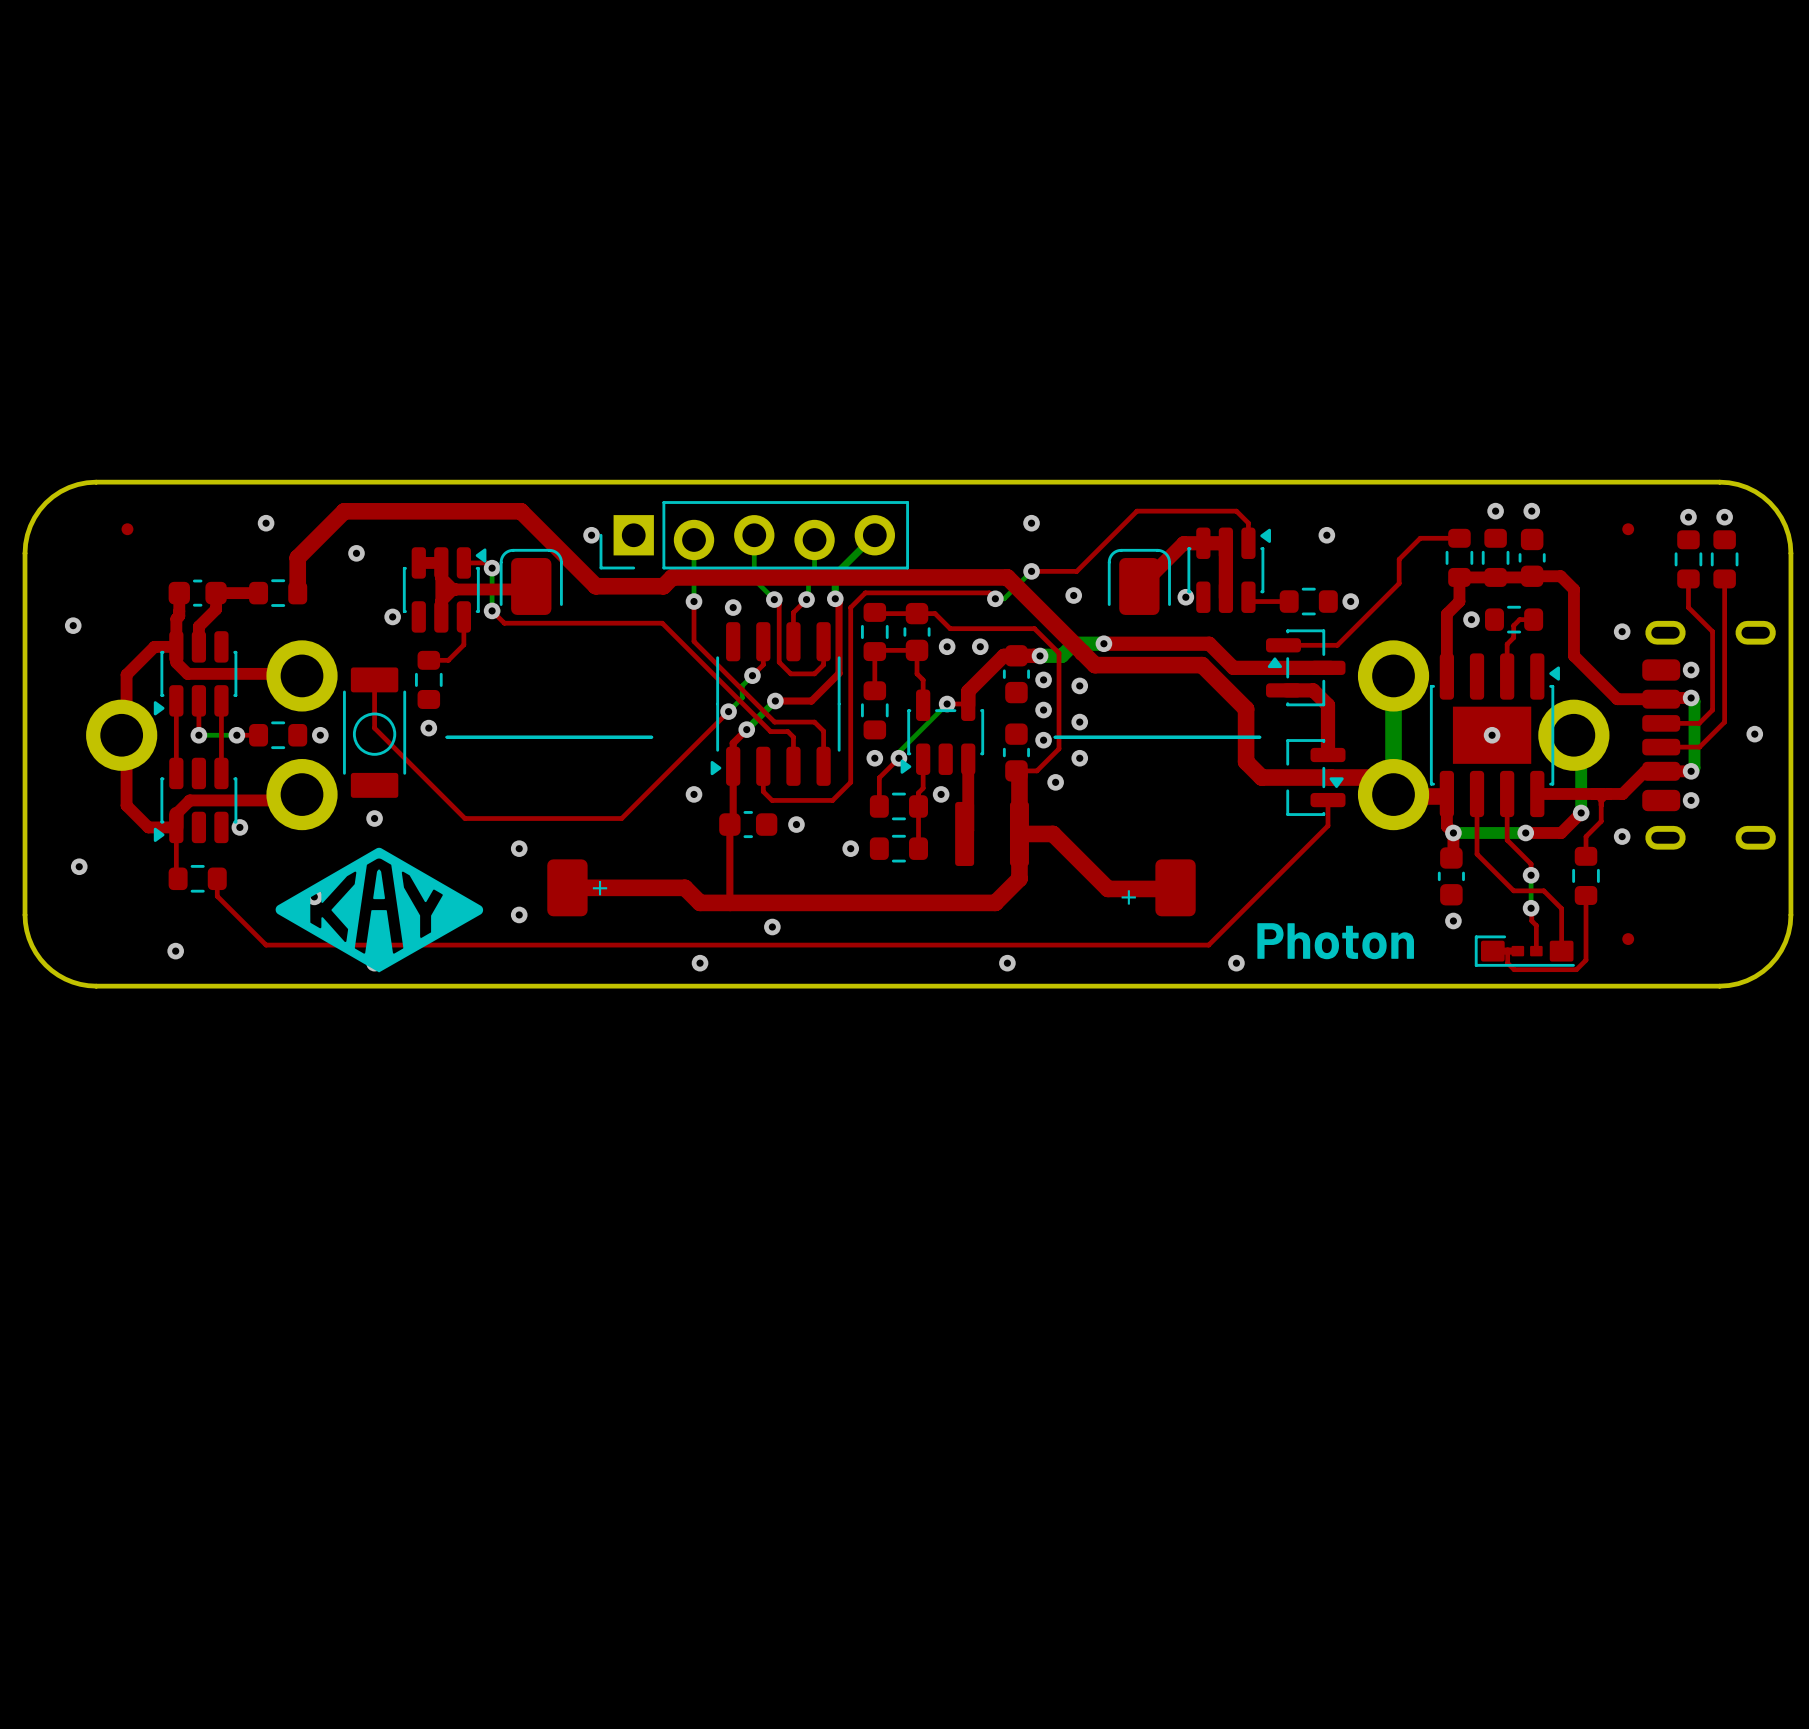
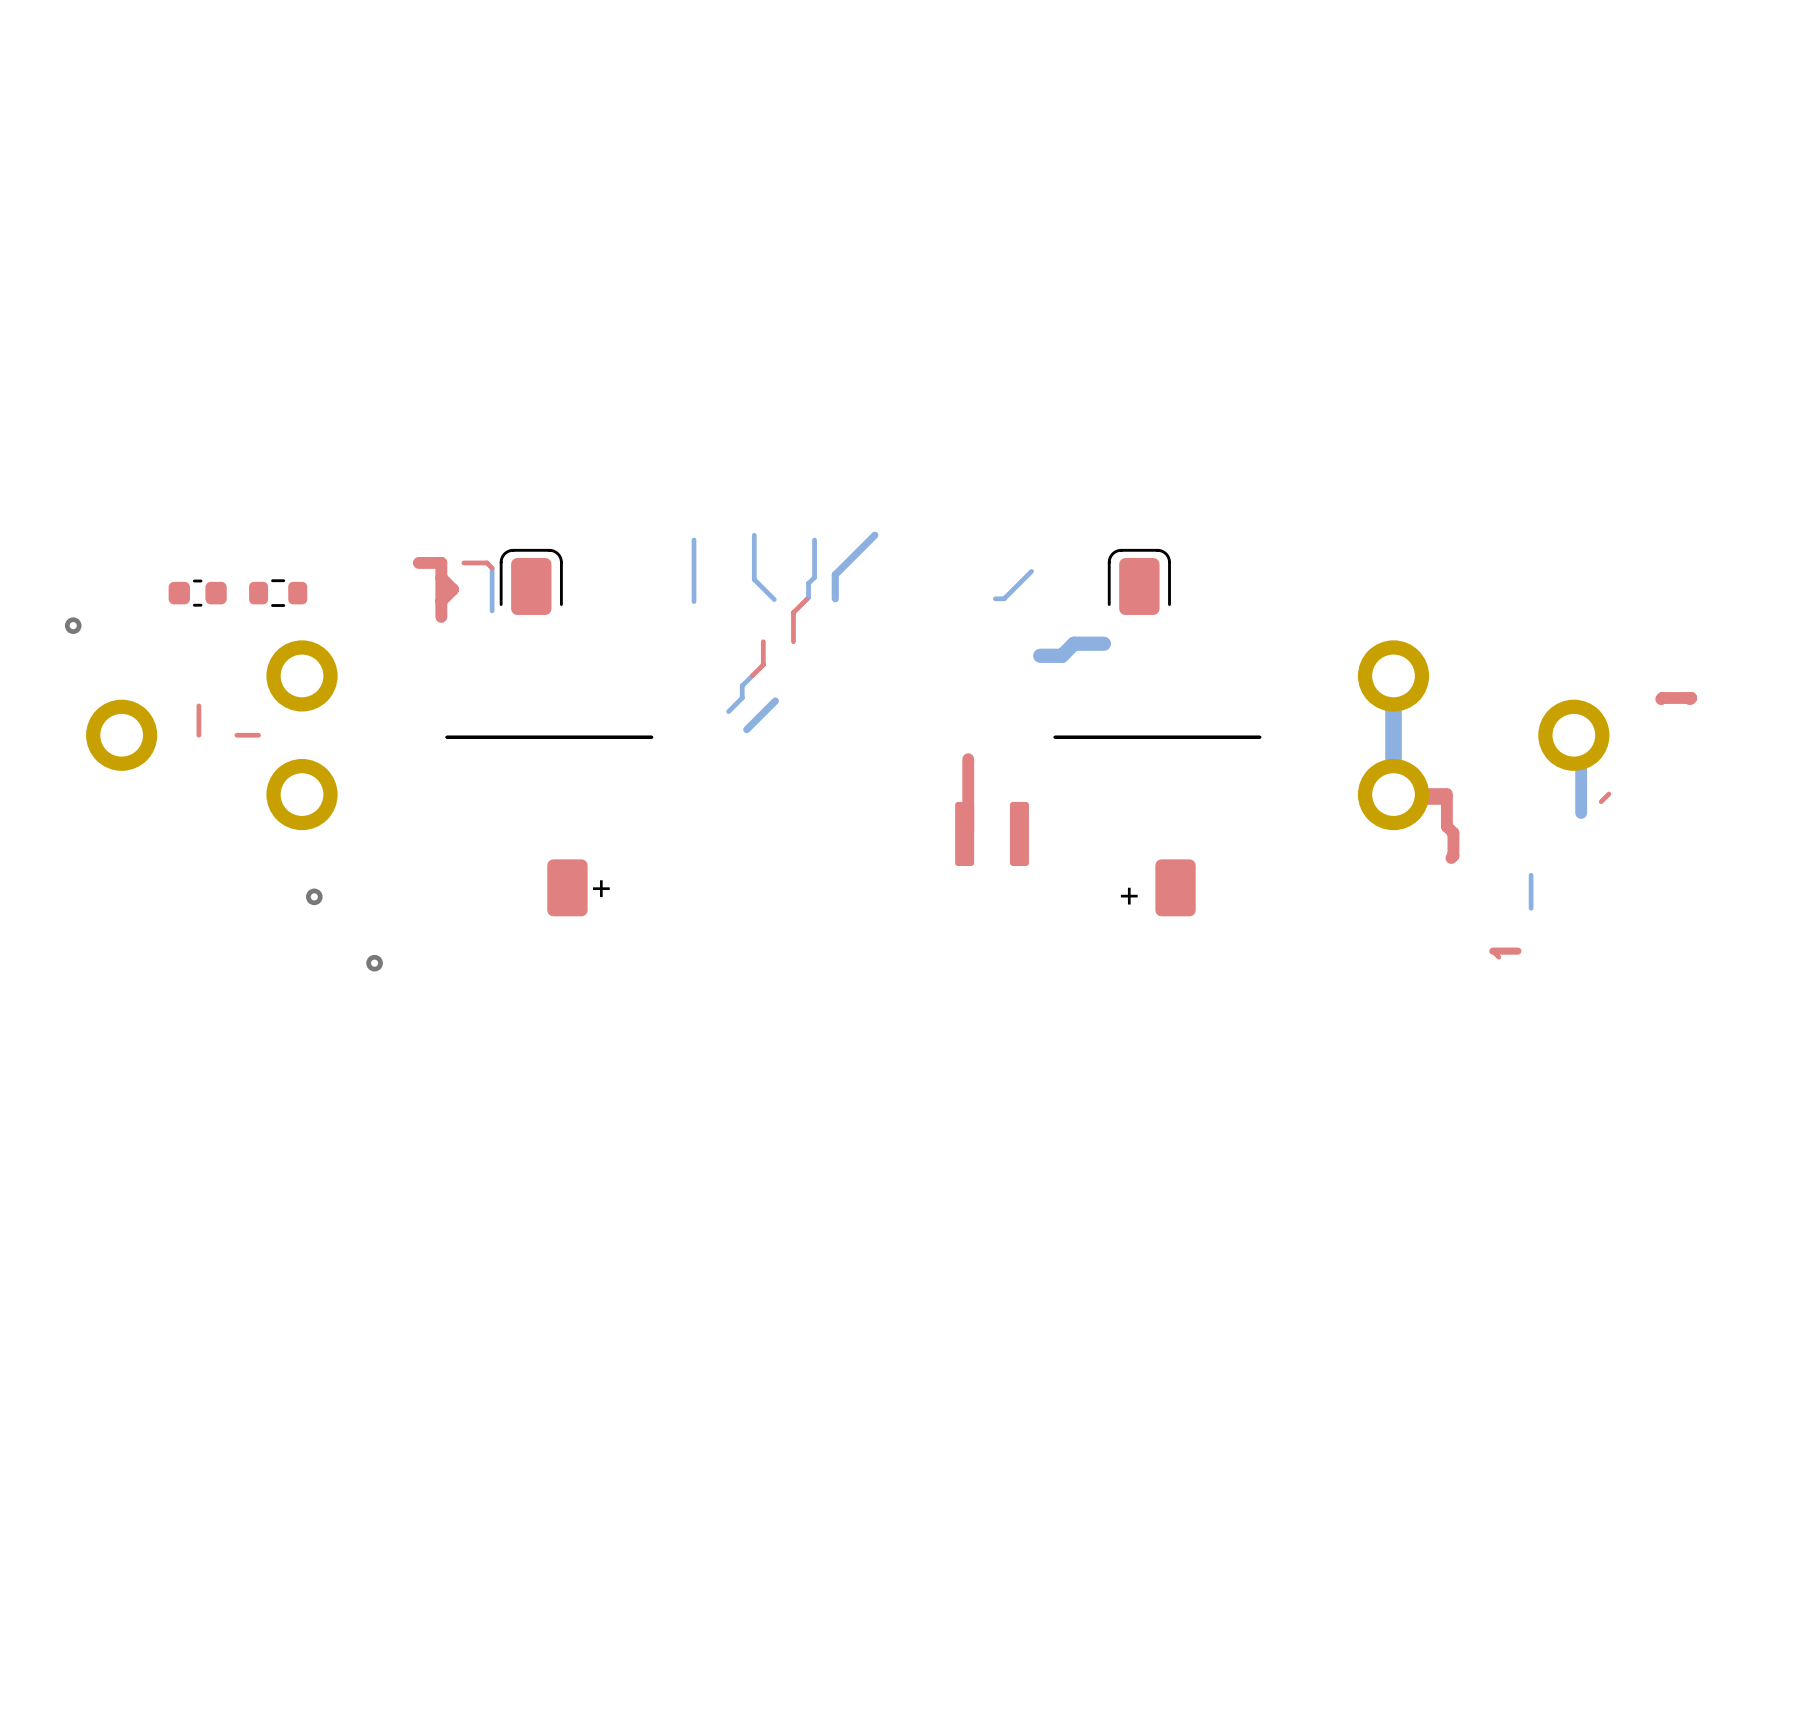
board edge: (96, 482) (1719, 482) (1738, 484) (1763, 496) (1776, 509) (1785, 526) (1790, 544) (1790, 914) (1788, 933) (1781, 950) (1763, 971) (1738, 983) (1719, 986) (96, 986) (80, 984) (65, 979) (45, 965) (32, 945) (25, 922) (25, 553) (30, 526) (45, 502) (68, 487) (96, 482) -> none
via: (1495, 511) -> none
via: (1531, 511) -> none
via: (1688, 517) -> none
via: (1724, 517) -> none
via: (266, 523) -> none
via: (1031, 523) -> none
part: (127, 529) -> none
part: (1628, 529) -> none
via: (591, 535) -> none
part: (754, 535) -> none
via: (1326, 535) -> none
top track: (1447, 538) (1420, 538) (1399, 559) (1399, 583) (1337, 645) (1286, 645) -> none
top track: (1248, 543) (1248, 523) (1236, 511) (1137, 511) (1076, 571) (1031, 571) -> none
via: (356, 553) -> none
part: (1459, 557) -> none
part: (1495, 557) -> none
part: (1532, 557) -> none
part: (1688, 559) -> none
part: (1724, 559) -> none
via: (492, 568) -> none
part: (1229, 570) -> none
via: (1031, 571) -> none
top track: (1532, 576) (1560, 576) (1573, 589) (1573, 655) (1617, 699) (1661, 699) (1660, 697) -> none
top track: (1530, 577) (1459, 577) (1459, 601) (1446, 614) (1446, 676) -> none
top track: (1688, 578) (1688, 607) (1712, 631) (1712, 710) (1699, 723) (1655, 723) -> none
top track: (1724, 578) (1724, 722) (1699, 747) (1655, 747) -> none
top track: (531, 587) (529, 589) (452, 589) -> none
top track: (1139, 587) (1183, 543) (1225, 543) (1225, 597) -> none
part: (444, 589) -> none
top track: (179, 593) (179, 616) (176, 618) (176, 662) (187, 673) (281, 673) -> none
top track: (258, 593) (216, 593) (216, 609) (198, 626) (198, 646) -> none
top track: (297, 593) (297, 557) (344, 511) (520, 511) (595, 586) (663, 586) (672, 577) (1007, 577) (1095, 665) (1202, 665) (1246, 709) (1246, 761) (1261, 777) (1400, 777) (1417, 794) -> none
via: (1073, 595) -> none
via: (1185, 597) -> none
top track: (1248, 597) (1252, 601) (1289, 601) -> none
top track: (835, 598) (839, 602) (839, 673) (811, 701) (775, 701) -> none
via: (835, 598) -> none
top track: (995, 598) (989, 592) (865, 592) (850, 607) (850, 782) (832, 800) (772, 800) (763, 791) (763, 766) -> none
via: (995, 598) -> none
top track: (774, 599) (779, 604) (779, 662) (790, 673) (814, 673) (823, 664) (823, 641) -> none
via: (774, 599) -> none
via: (806, 599) -> none
top track: (694, 601) (694, 641) (774, 722) (814, 722) (823, 731) (823, 766) -> none
via: (694, 601) -> none
part: (1308, 601) -> none
via: (1350, 601) -> none
via: (733, 607) -> none
top track: (492, 610) (504, 623) (662, 623) (770, 731) (787, 731) (793, 737) (793, 766) -> none
via: (492, 610) -> none
top track: (874, 612) (935, 613) (950, 628) (1034, 628) (1059, 653) (1059, 748) (1036, 770) (1025, 770) -> none
via: (392, 616) -> none
via: (1471, 619) -> none
part: (1514, 619) -> none
top track: (1533, 619) (1519, 619) (1513, 625) (1513, 637) (1507, 644) (1507, 676) -> none
top track: (463, 621) (463, 644) (448, 660) (422, 660) -> none
part: (874, 631) -> none
part: (917, 631) -> none
via: (1622, 631) -> none
top track: (1103, 643) (1209, 643) (1233, 667) (1331, 667) -> none
via: (1103, 643) -> none
top track: (176, 646) (154, 646) (126, 674) (126, 805) (148, 827) (176, 827) -> none
via: (947, 646) -> none
via: (980, 646) -> none
top track: (1033, 655) (1003, 655) (968, 691) (968, 705) (947, 704) -> none
via: (1040, 655) -> none
part: (1305, 667) -> none
via: (1691, 670) -> none
part: (195, 673) -> none
part: (1016, 674) -> none
via: (752, 675) -> none
top track: (374, 679) (374, 728) (464, 818) (621, 818) (728, 711) -> none
part: (428, 679) -> none
via: (1043, 679) -> none
via: (1079, 685) -> none
top track: (874, 690) (876, 650) (917, 650) (917, 673) (923, 680) (923, 700) -> none
top track: (1286, 690) (1313, 690) (1328, 705) (1328, 754) -> none
bottom track: (1691, 697) (1694, 701) (1694, 767) (1691, 771) -> none
via: (1691, 697) -> none
via: (775, 701) -> none
part: (775, 704) -> none
bottom track: (947, 704) (898, 752) (898, 758) -> none
via: (947, 704) -> none
top track: (176, 705) (176, 768) -> none
top track: (221, 705) (221, 768) -> none
part: (874, 710) -> none
via: (1043, 710) -> none
via: (728, 711) -> none
via: (1079, 722) -> none
via: (428, 728) -> none
top track: (746, 729) (733, 743) (733, 821) (729, 824) (729, 902) -> none
via: (746, 729) -> none
part: (374, 732) -> none
part: (942, 732) -> none
via: (1754, 734) -> none
bottom track: (198, 735) (236, 735) -> none
via: (198, 735) -> none
via: (236, 735) -> none
part: (278, 735) -> none
via: (320, 735) -> none
via: (1492, 735) -> none
part: (1494, 735) -> none
part: (1709, 735) -> none
via: (1043, 740) -> none
part: (1016, 752) -> none
via: (874, 758) -> none
top track: (898, 758) (879, 777) (879, 806) -> none
via: (898, 758) -> none
via: (1079, 758) -> none
top track: (923, 759) (923, 788) (918, 792) (918, 848) -> none
top track: (1019, 770) (1019, 878) (995, 902) (700, 902) (684, 887) (567, 887) -> none
top track: (1691, 771) (1645, 771) (1622, 793) (1537, 793) -> none
via: (1691, 771) -> none
part: (1305, 777) -> none
via: (1055, 782) -> none
top track: (1477, 793) (1477, 854) (1513, 890) (1543, 890) (1561, 908) (1561, 951) -> none
top track: (1507, 793) (1507, 840) (1531, 864) (1531, 875) -> none
top track: (1601, 793) (1601, 821) (1586, 836) (1586, 856) -> none
via: (694, 794) -> none
via: (941, 794) -> none
part: (195, 800) -> none
top track: (277, 800) (189, 800) (176, 813) (176, 827) -> none
top track: (1328, 800) (1328, 825) (1208, 945) (266, 945) (217, 896) (217, 878) -> none
via: (1691, 800) -> none
part: (898, 806) -> none
top track: (1581, 812) (1561, 832) (1525, 832) -> none
via: (1581, 812) -> none
via: (374, 818) -> none
part: (748, 824) -> none
via: (796, 824) -> none
top track: (176, 827) (176, 877) (178, 878) -> none
via: (239, 827) -> none
bottom track: (1453, 832) (1525, 832) -> none
via: (1453, 832) -> none
via: (1525, 832) -> none
top track: (1019, 833) (1052, 833) (1107, 888) (1172, 888) -> none
via: (1622, 836) -> none
drawing: [275, 847, 484, 973] -> none
via: (519, 848) -> none
via: (850, 848) -> none
part: (898, 848) -> none
via: (79, 866) -> none
via: (1531, 875) -> none
part: (1586, 875) -> none
part: (1451, 876) -> none
part: (197, 878) -> none
top track: (1586, 895) (1586, 960) (1576, 969) (1514, 969) (1507, 963) (1507, 951) -> none
top track: (1531, 908) (1531, 920) (1536, 925) (1536, 951) -> none
via: (1531, 908) -> none
via: (519, 914) -> none
via: (1453, 920) -> none
via: (772, 927) -> none
part: (1628, 939) -> none
text: Photon (1335, 941) -> none
via: (175, 951) -> none
part: (1524, 951) -> none
via: (700, 963) -> none
via: (1007, 963) -> none
via: (1236, 963) -> none

